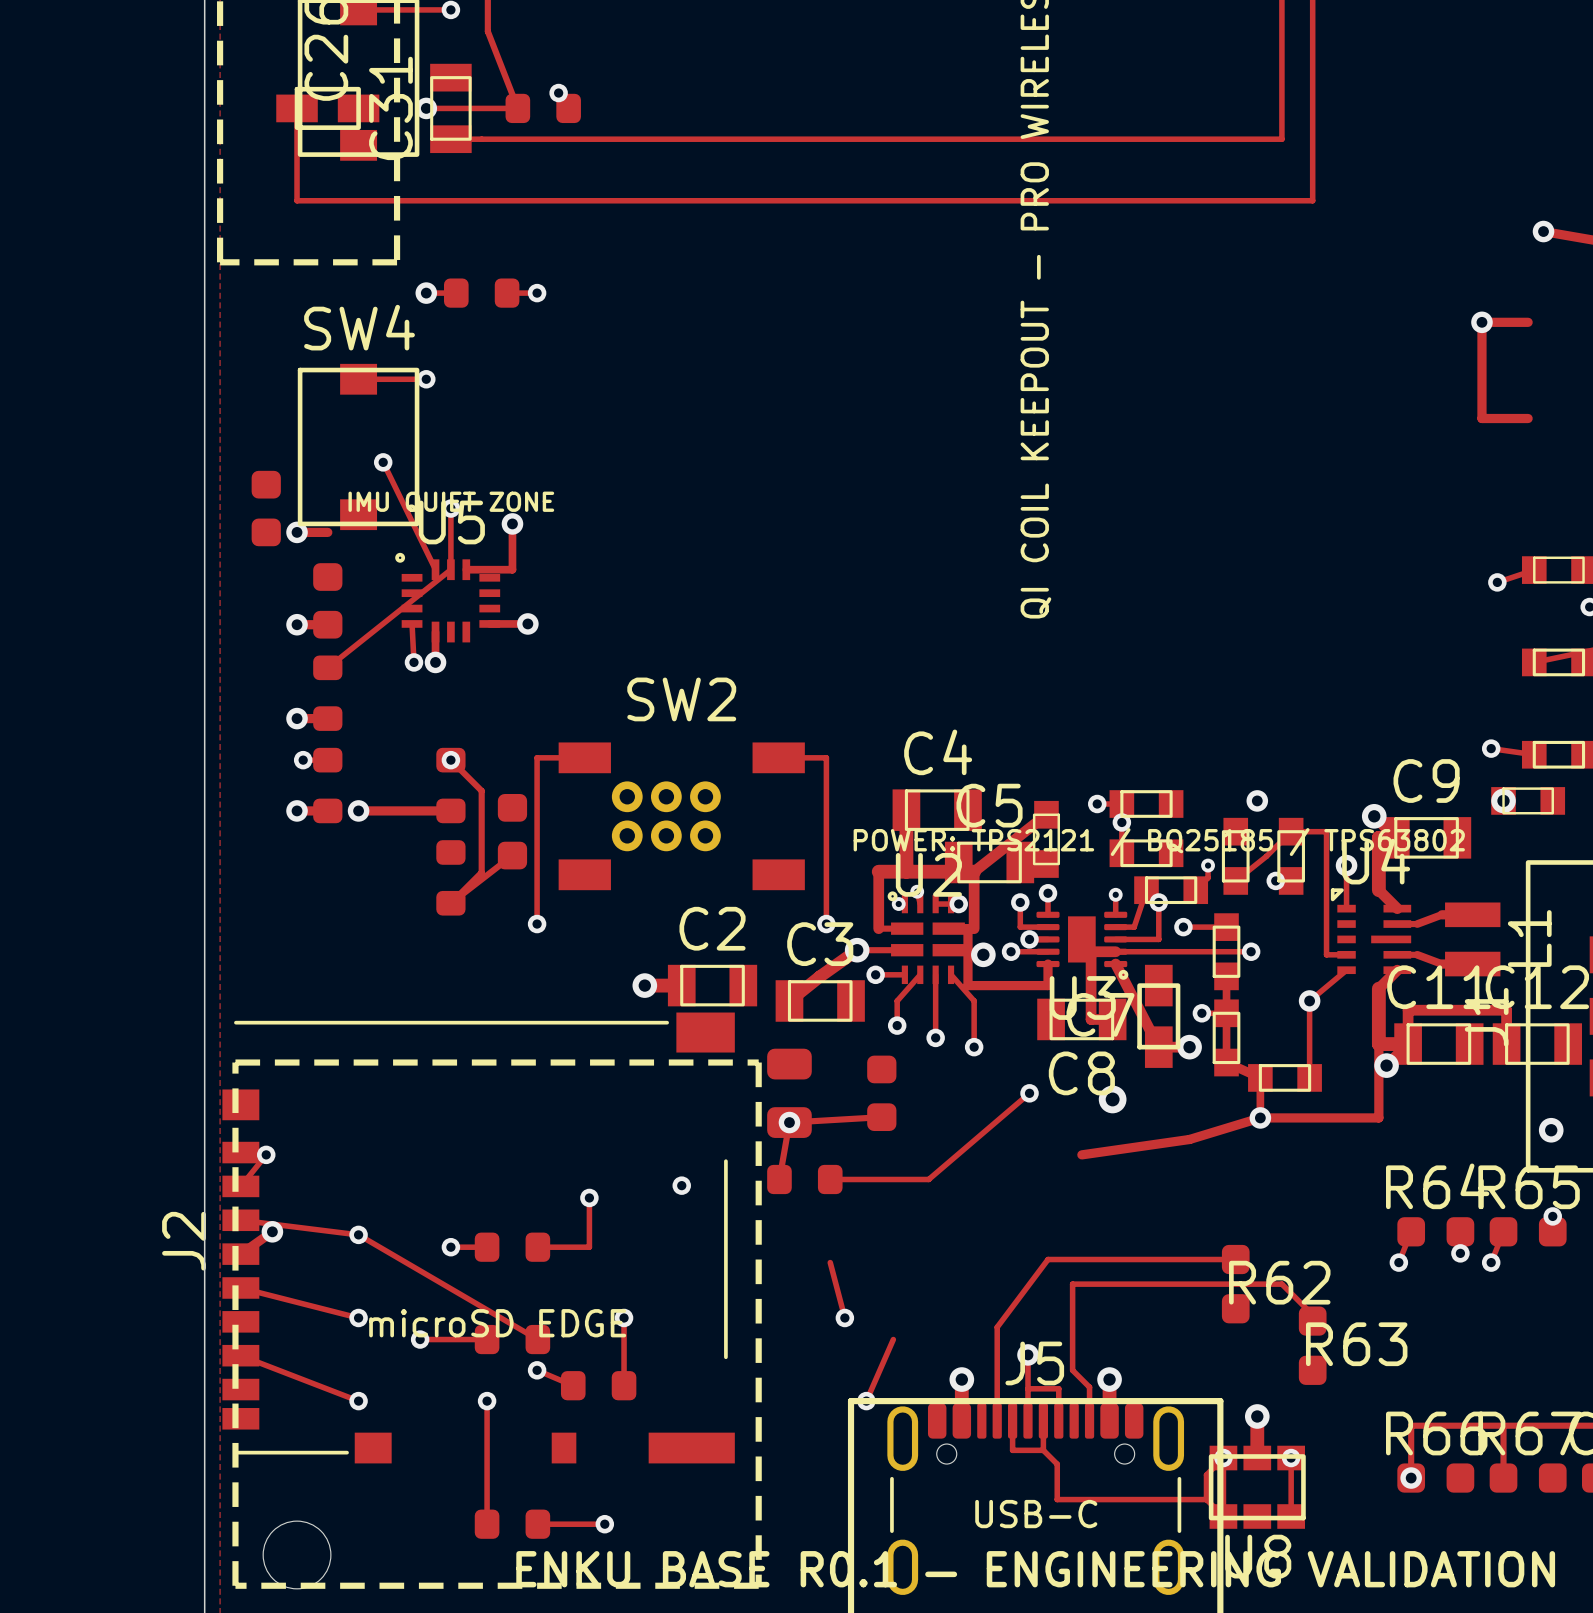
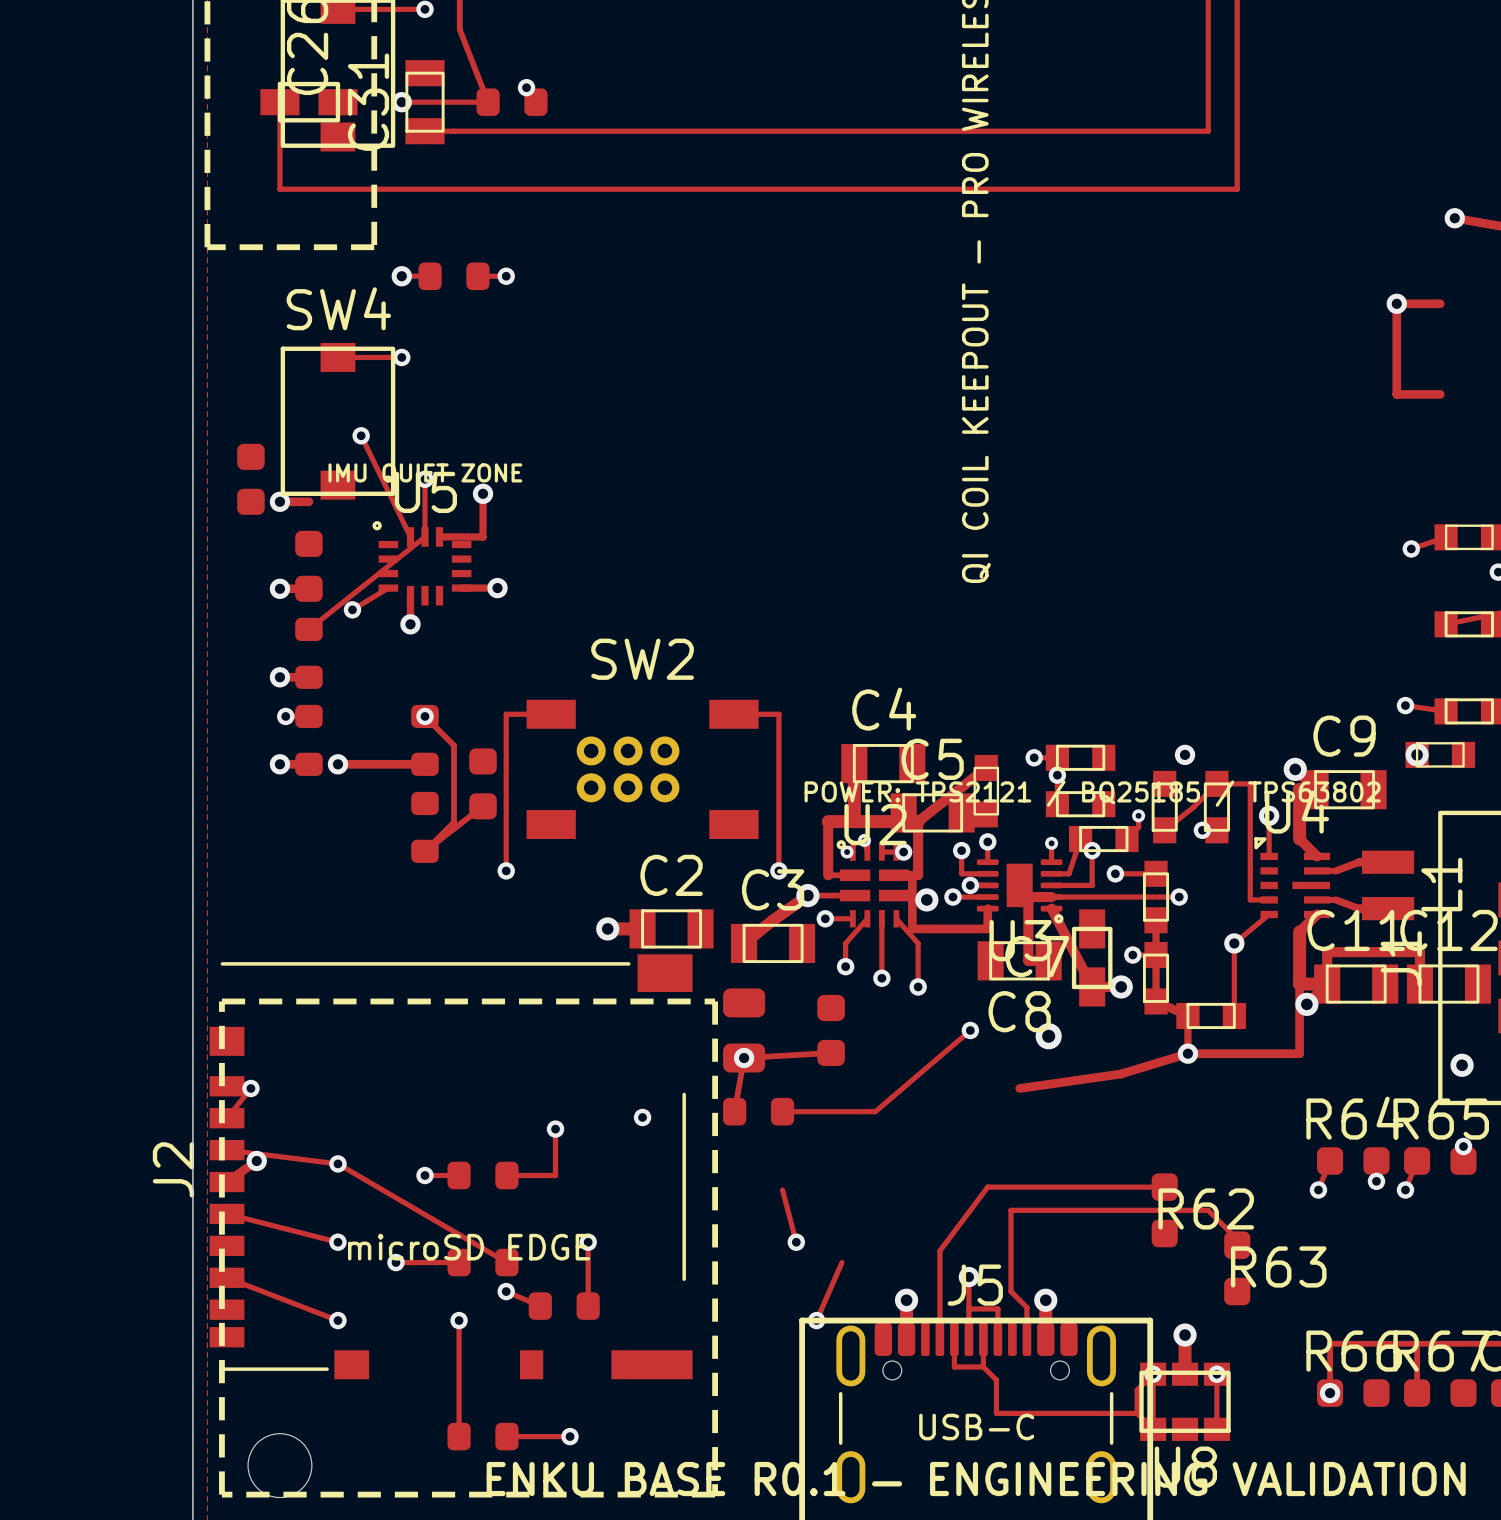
track: (412, 623) (413, 662) -> (388, 588) (352, 609)
via position: (413, 662) -> (352, 609)

